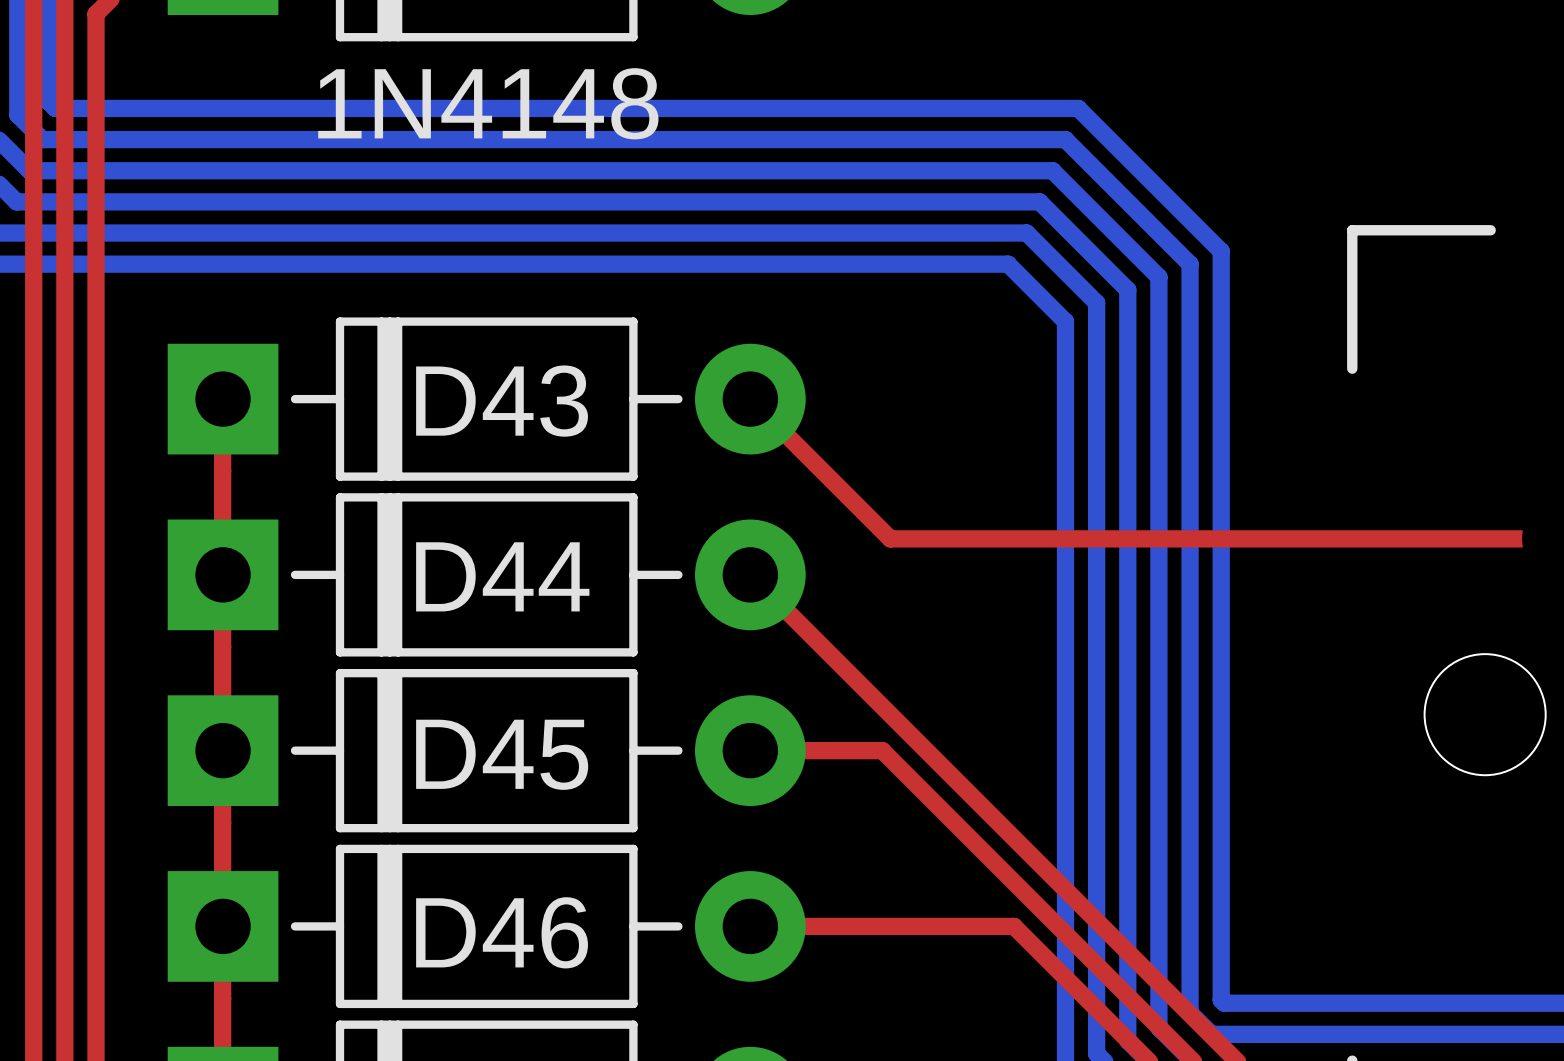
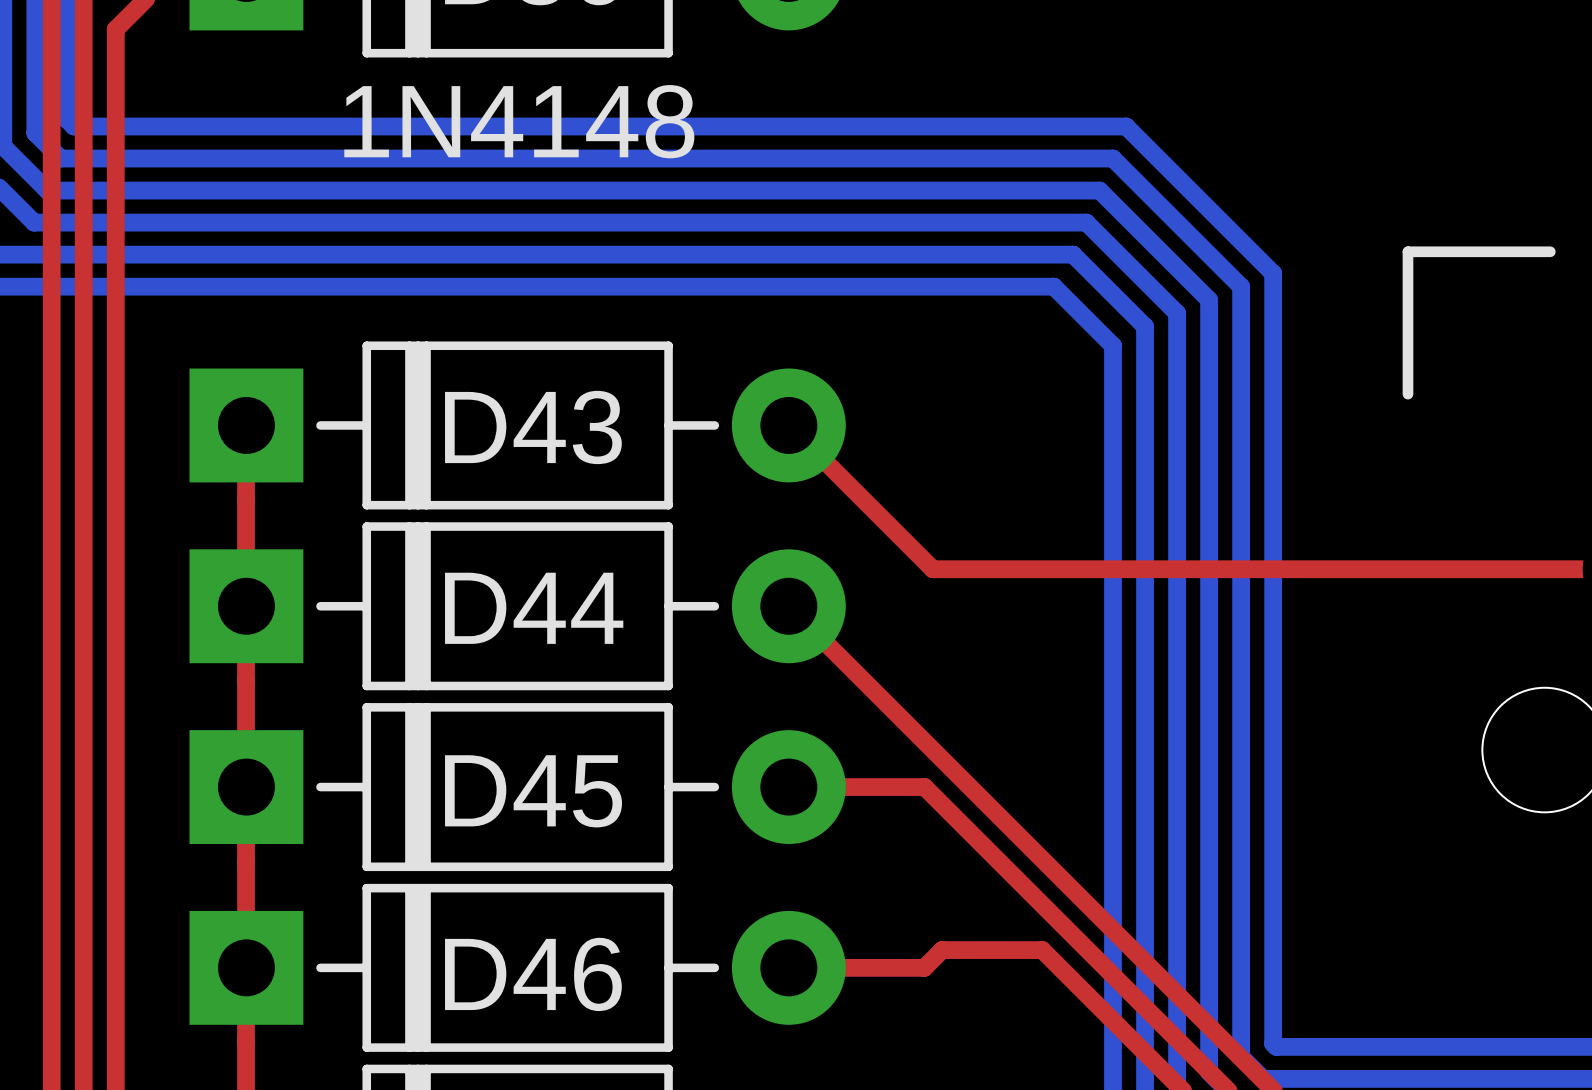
top track: (882, 926) (1014, 926) -> (924, 967) (942, 950) (1042, 950) (1060, 967)

